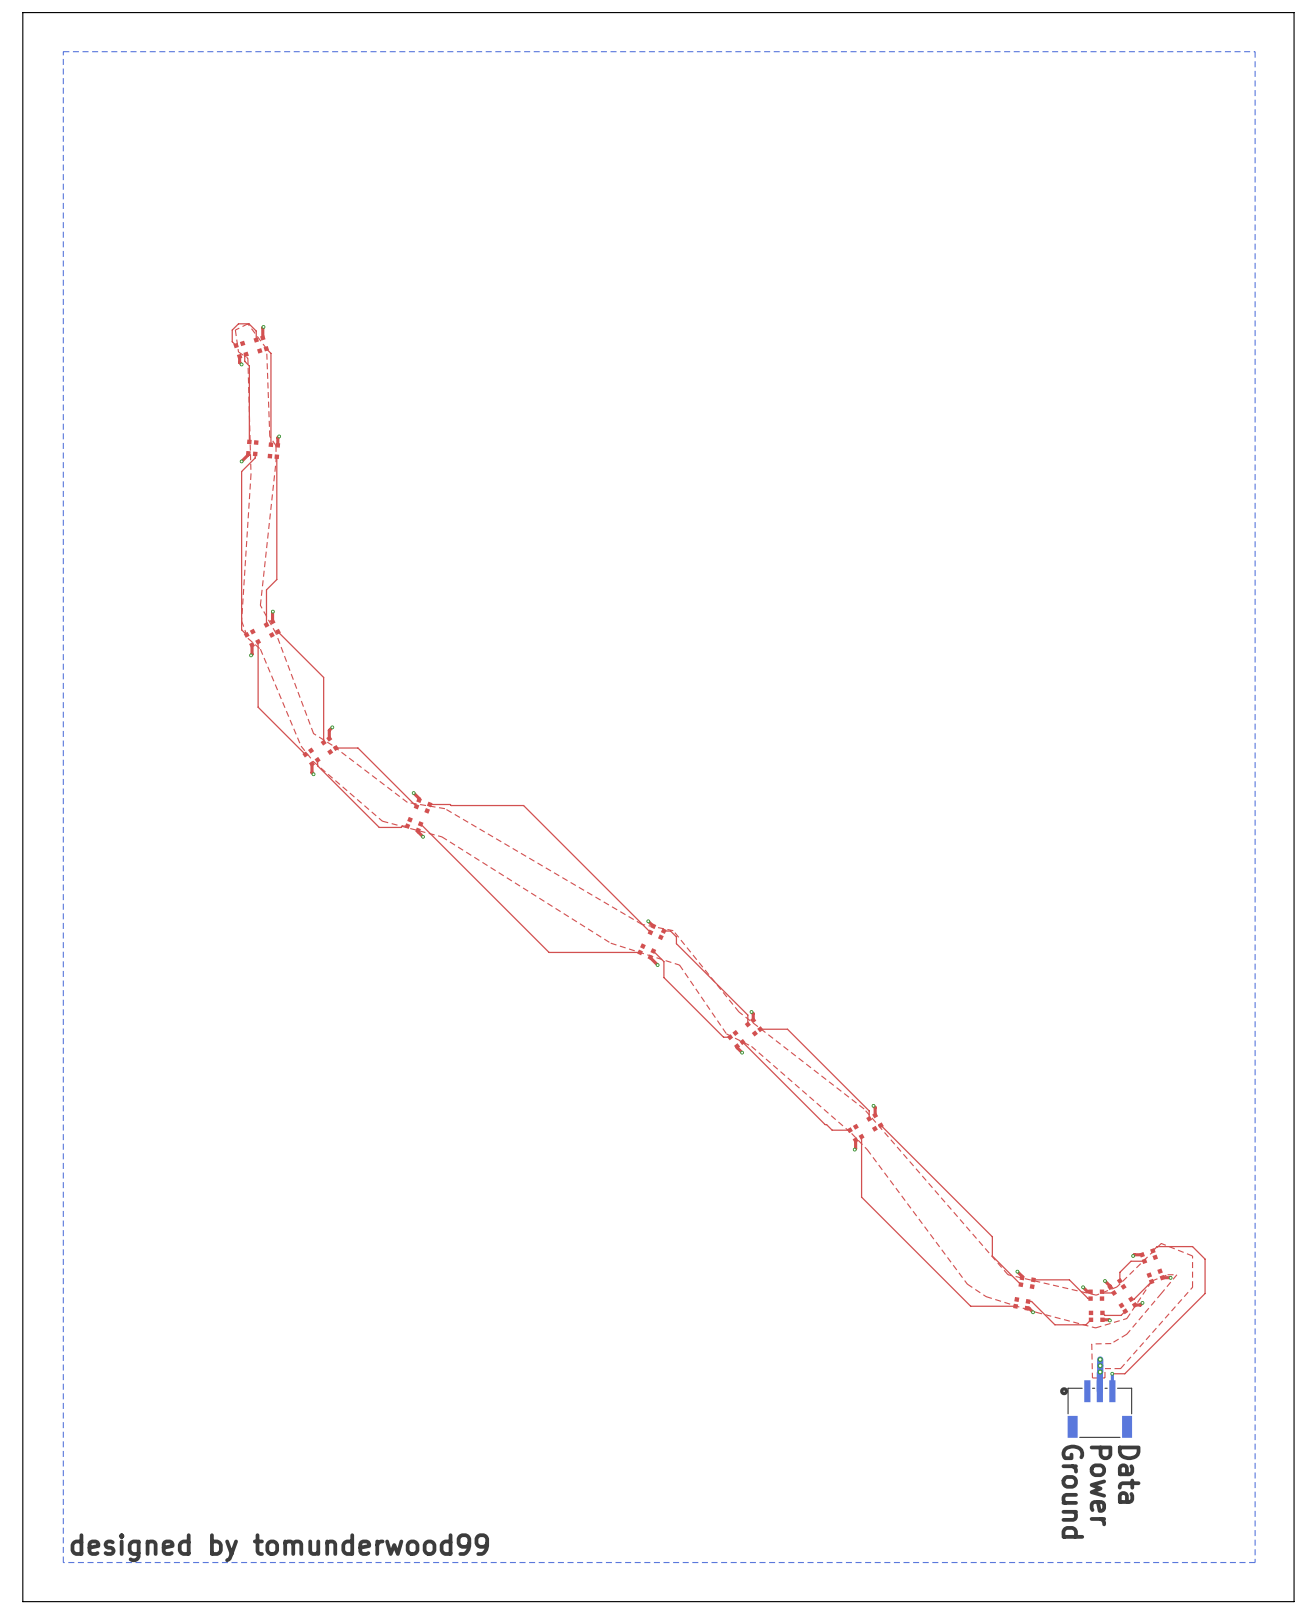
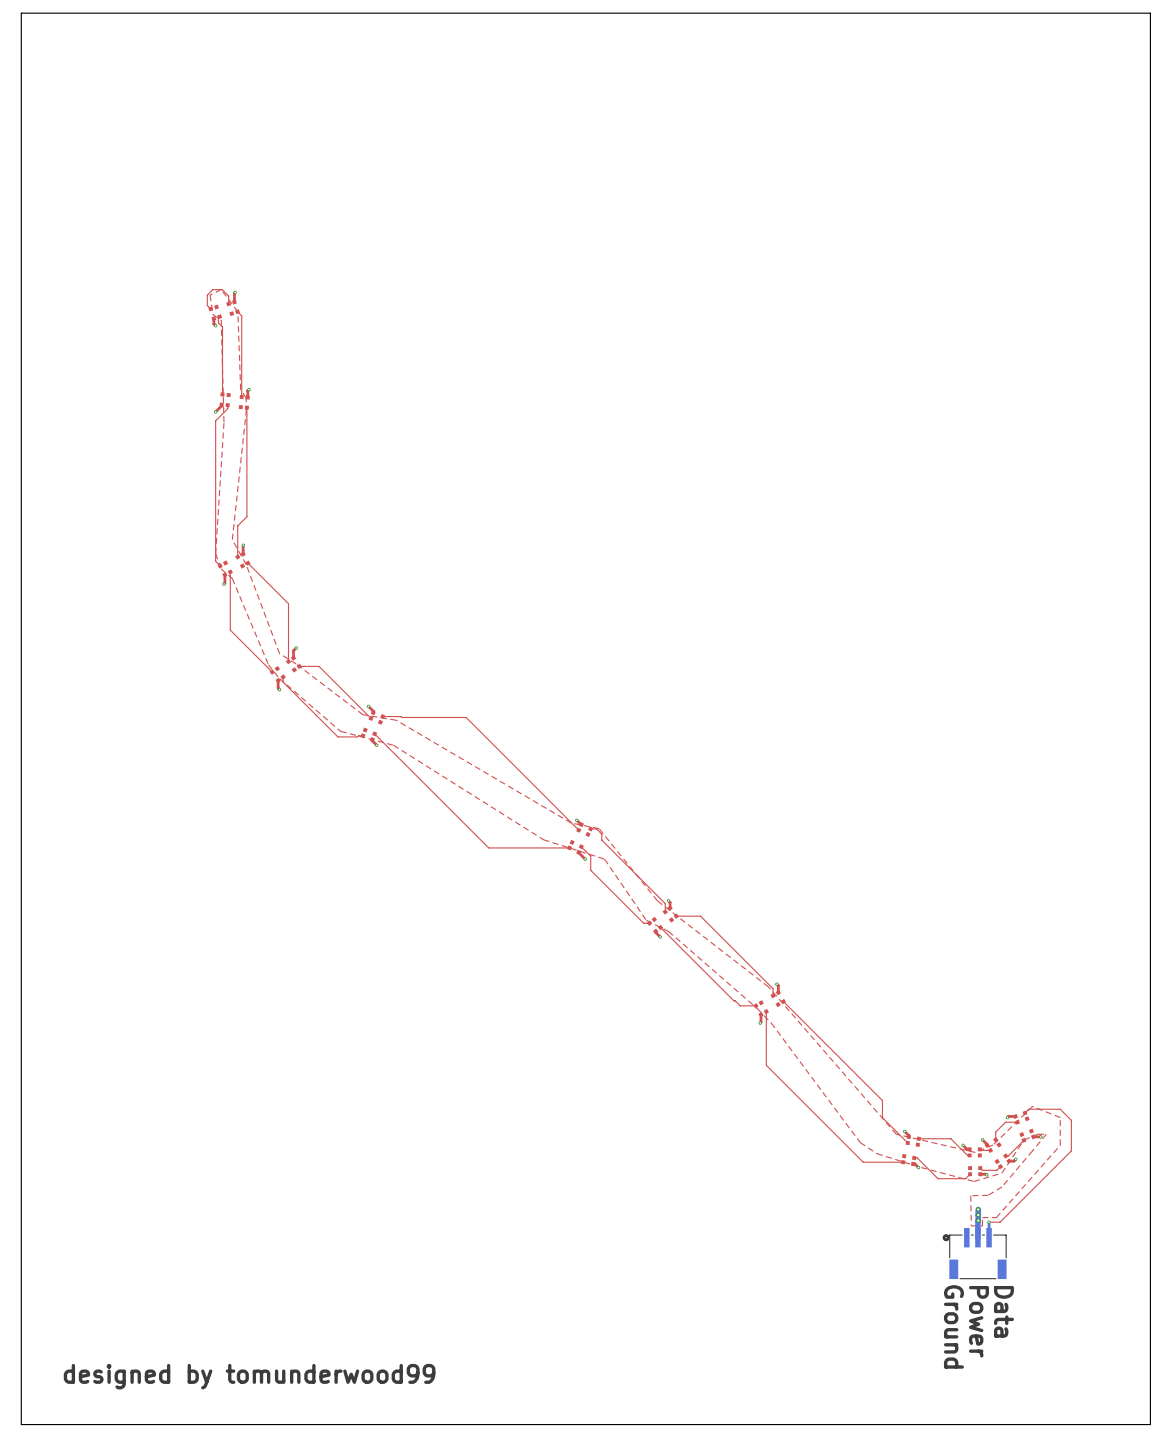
bottom zone outline: (1255, 51) (1255, 1562) (63, 1562) (63, 51) (1255, 51) -> none

